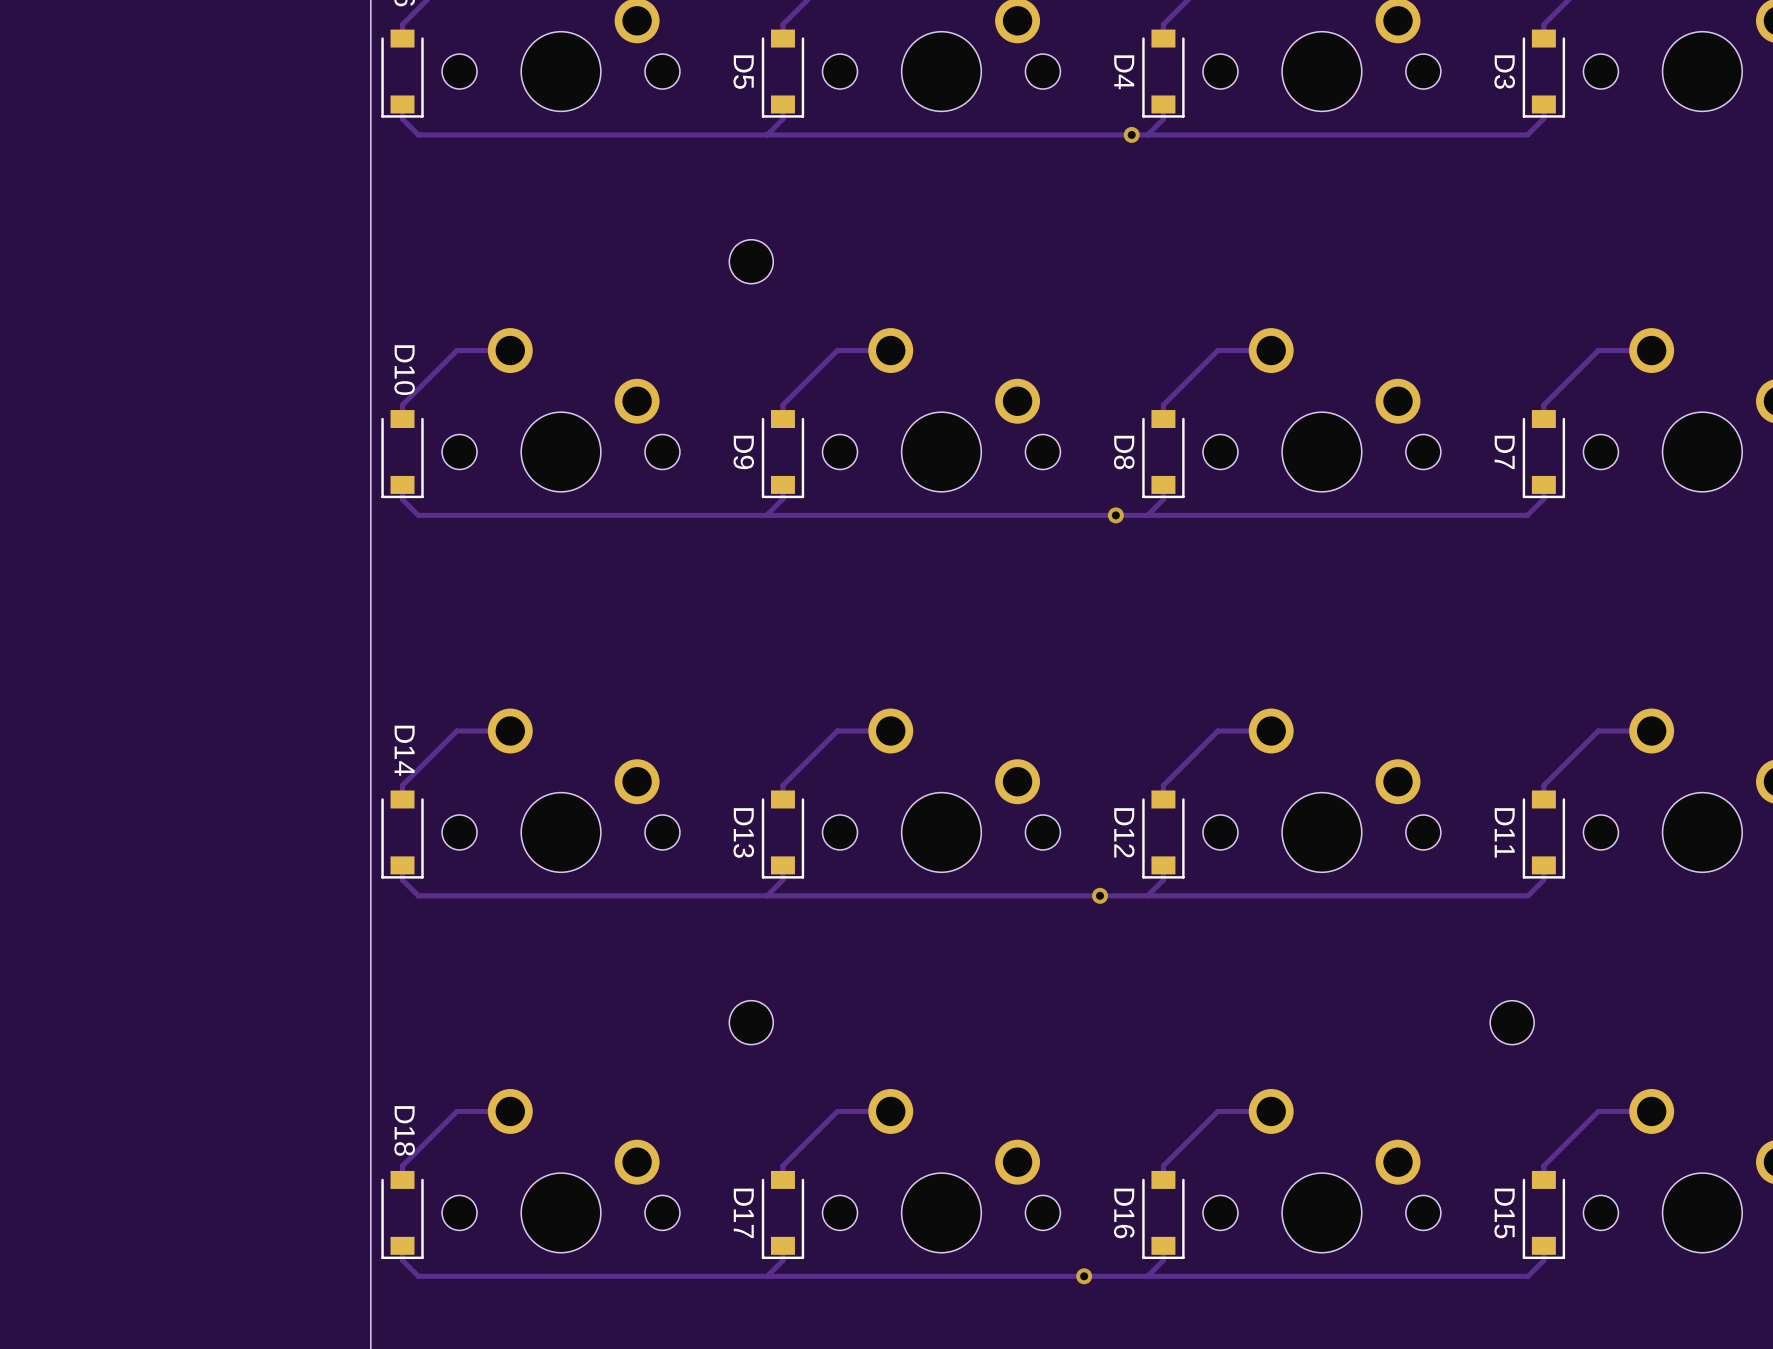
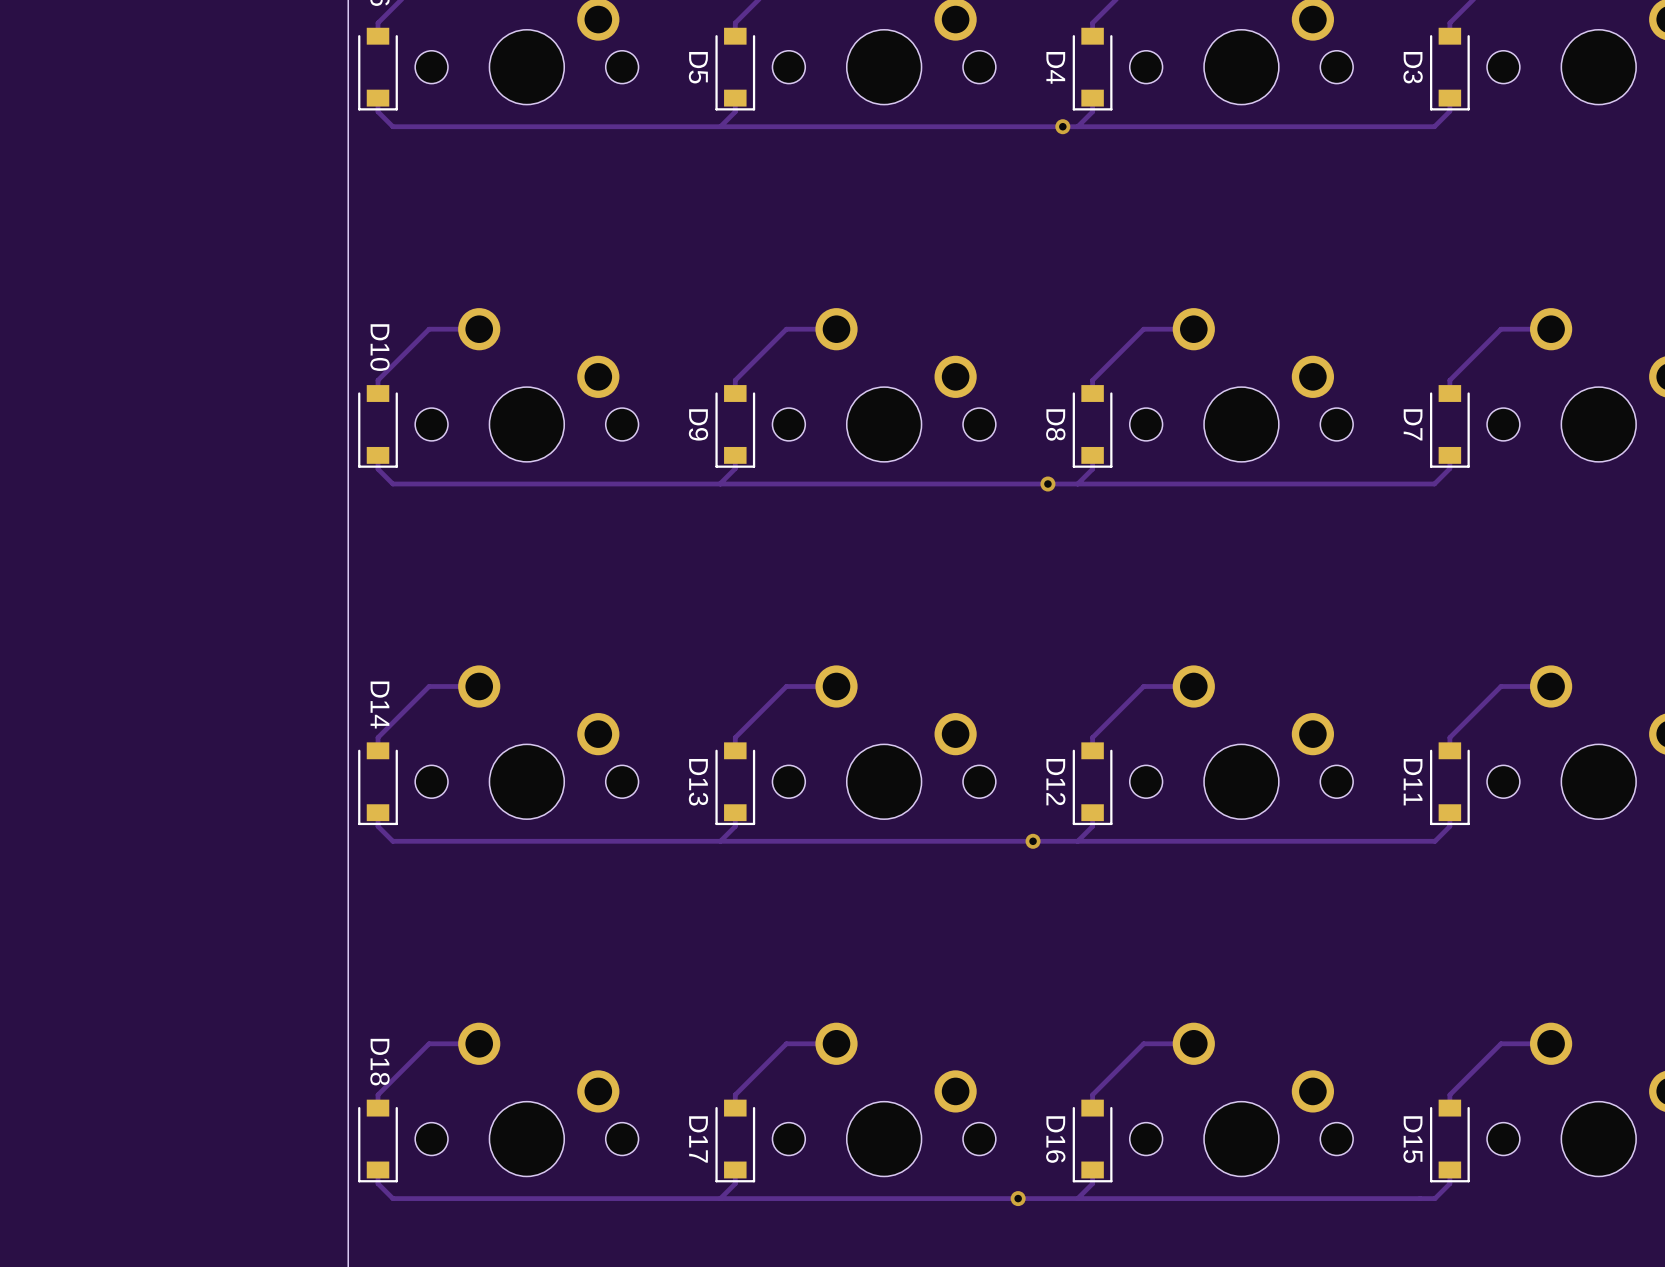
part: (751, 261) -> none
part: (751, 1022) -> none
part: (1512, 1022) -> none

